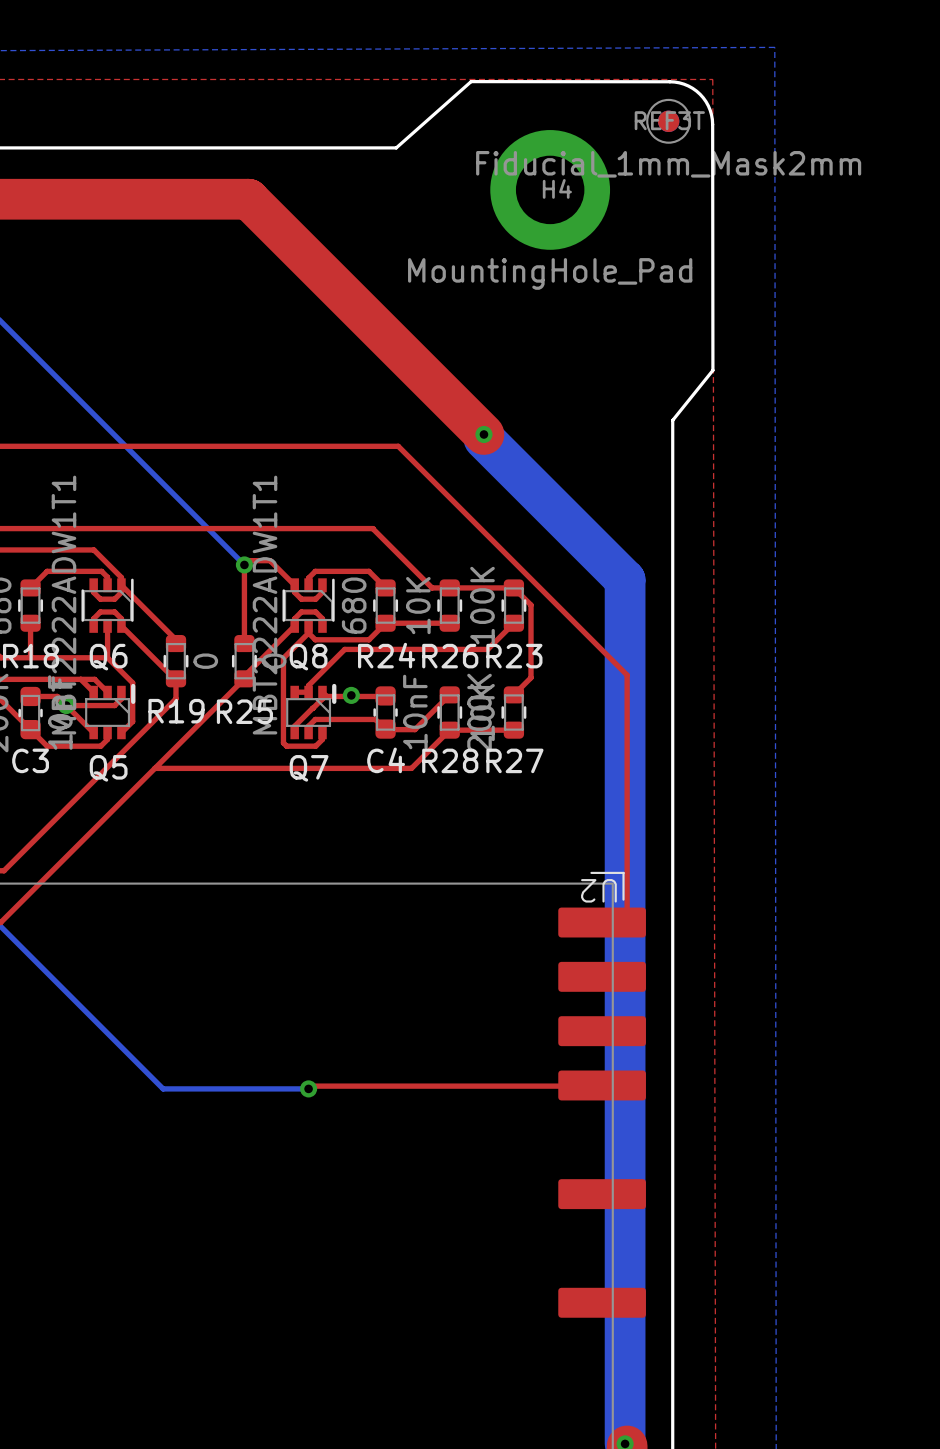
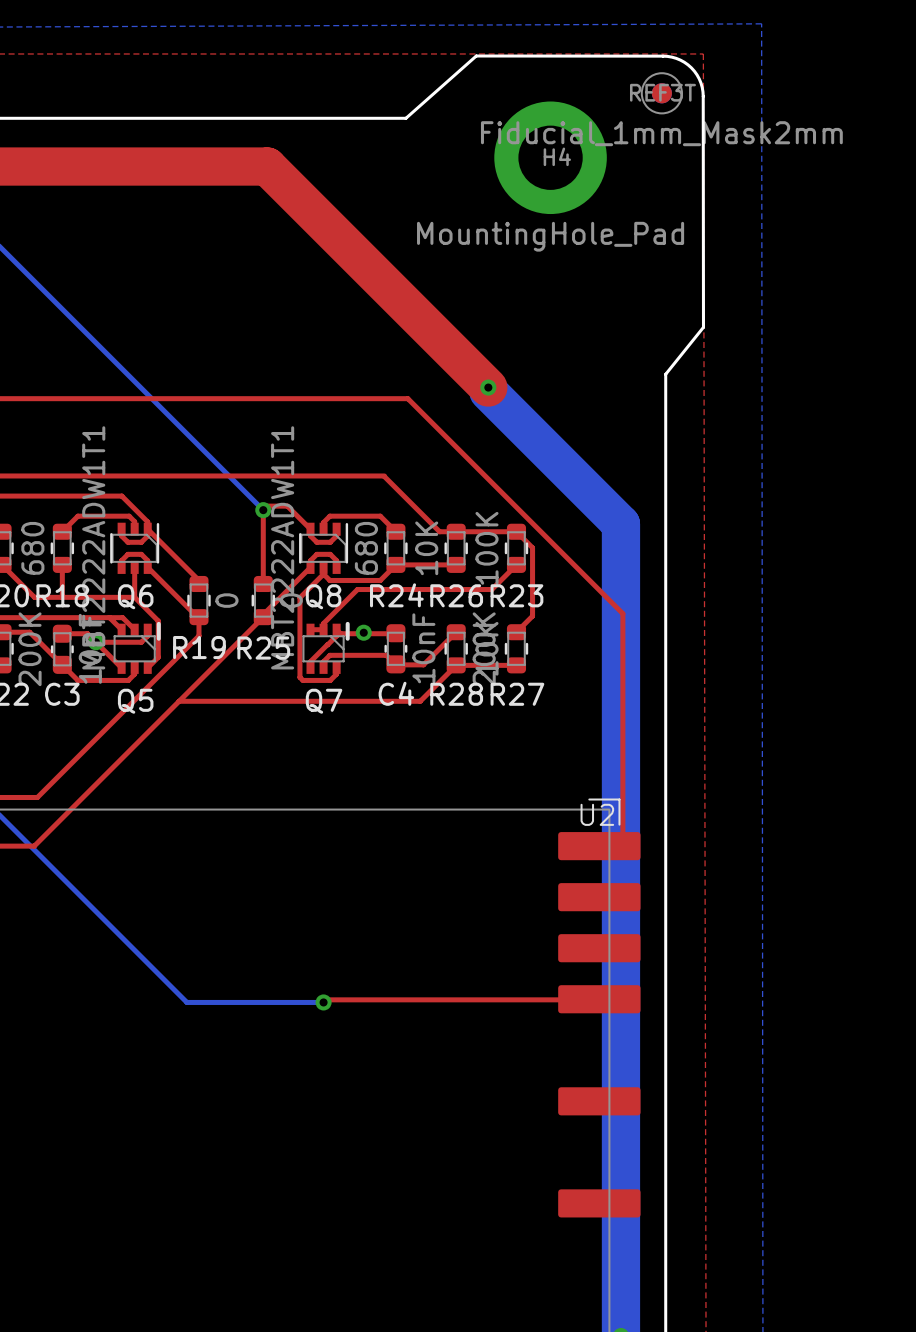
U2 name rotation: 0° (598, 890) -> 180° (597, 814)

